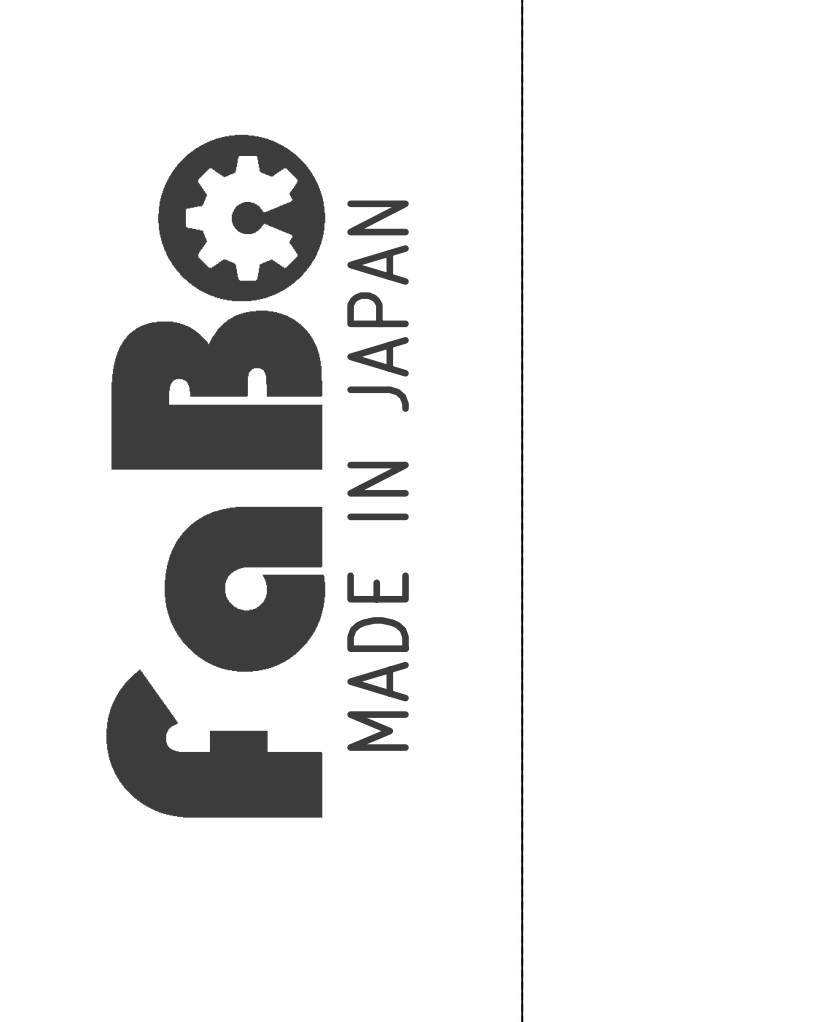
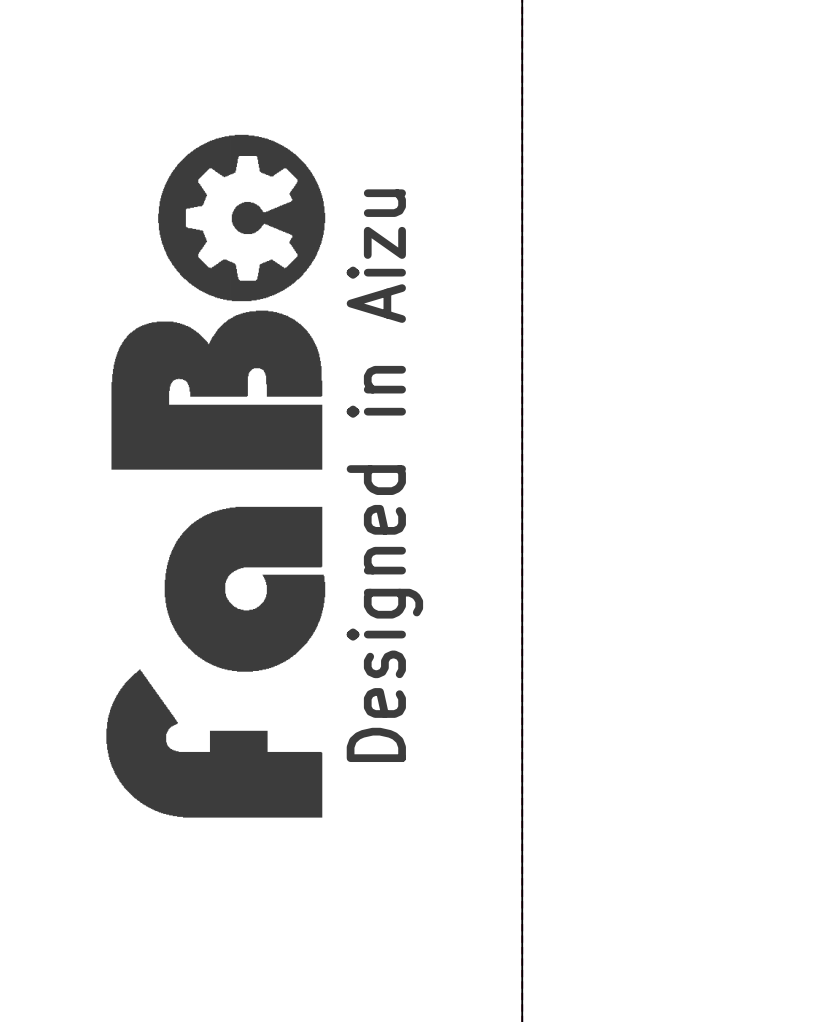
text: MADE IN JAPAN (378, 475) -> Designed in Aizu (384, 475)

